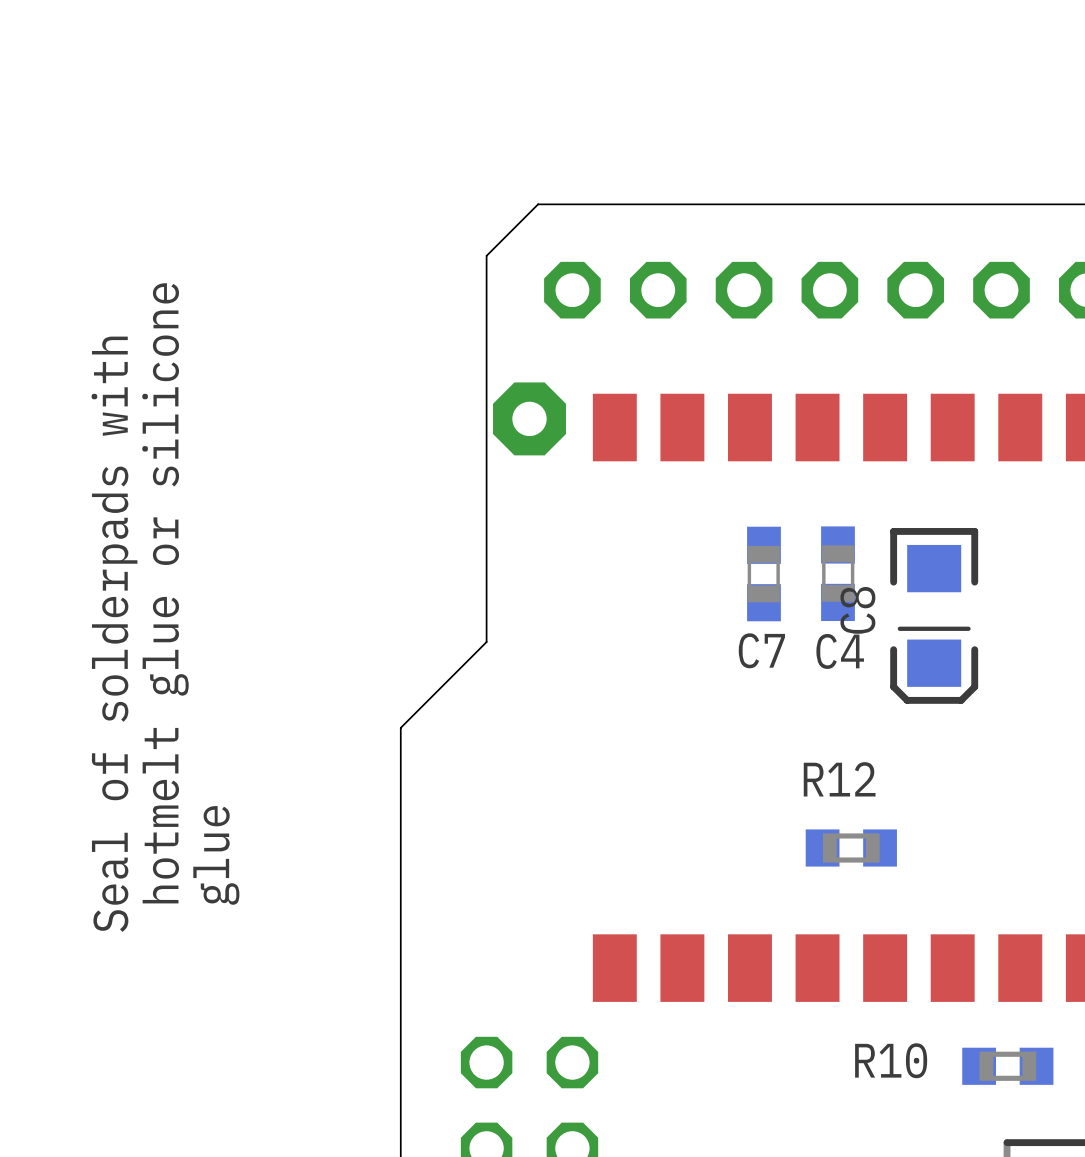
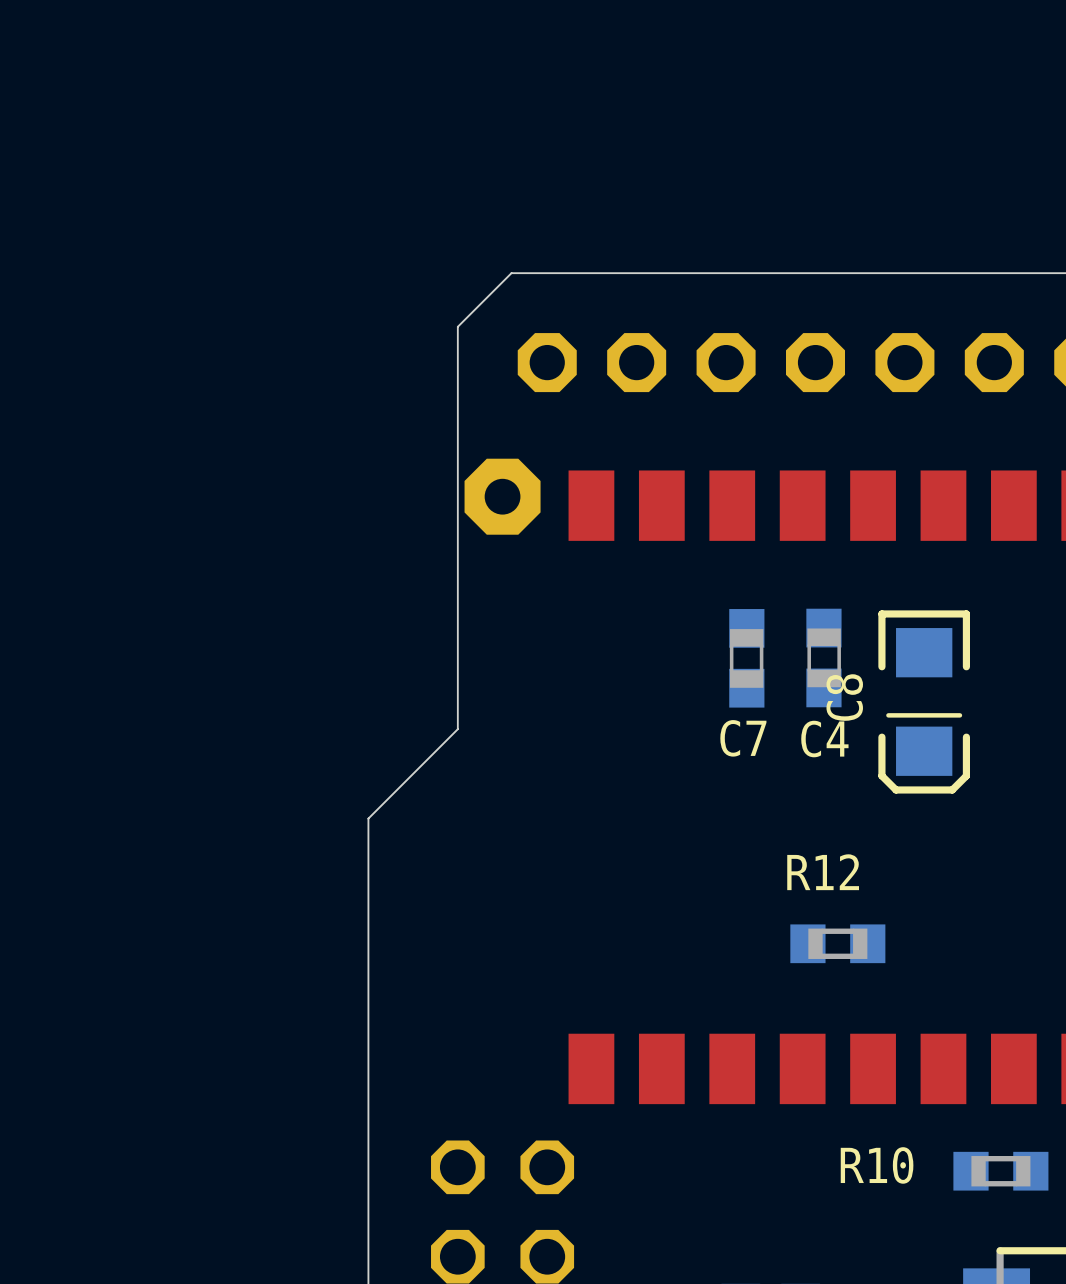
text: hotmelt glue or silicone (165, 593) -> none
text: Seal of solderpads with (114, 634) -> none
text: glue (216, 855) -> none

